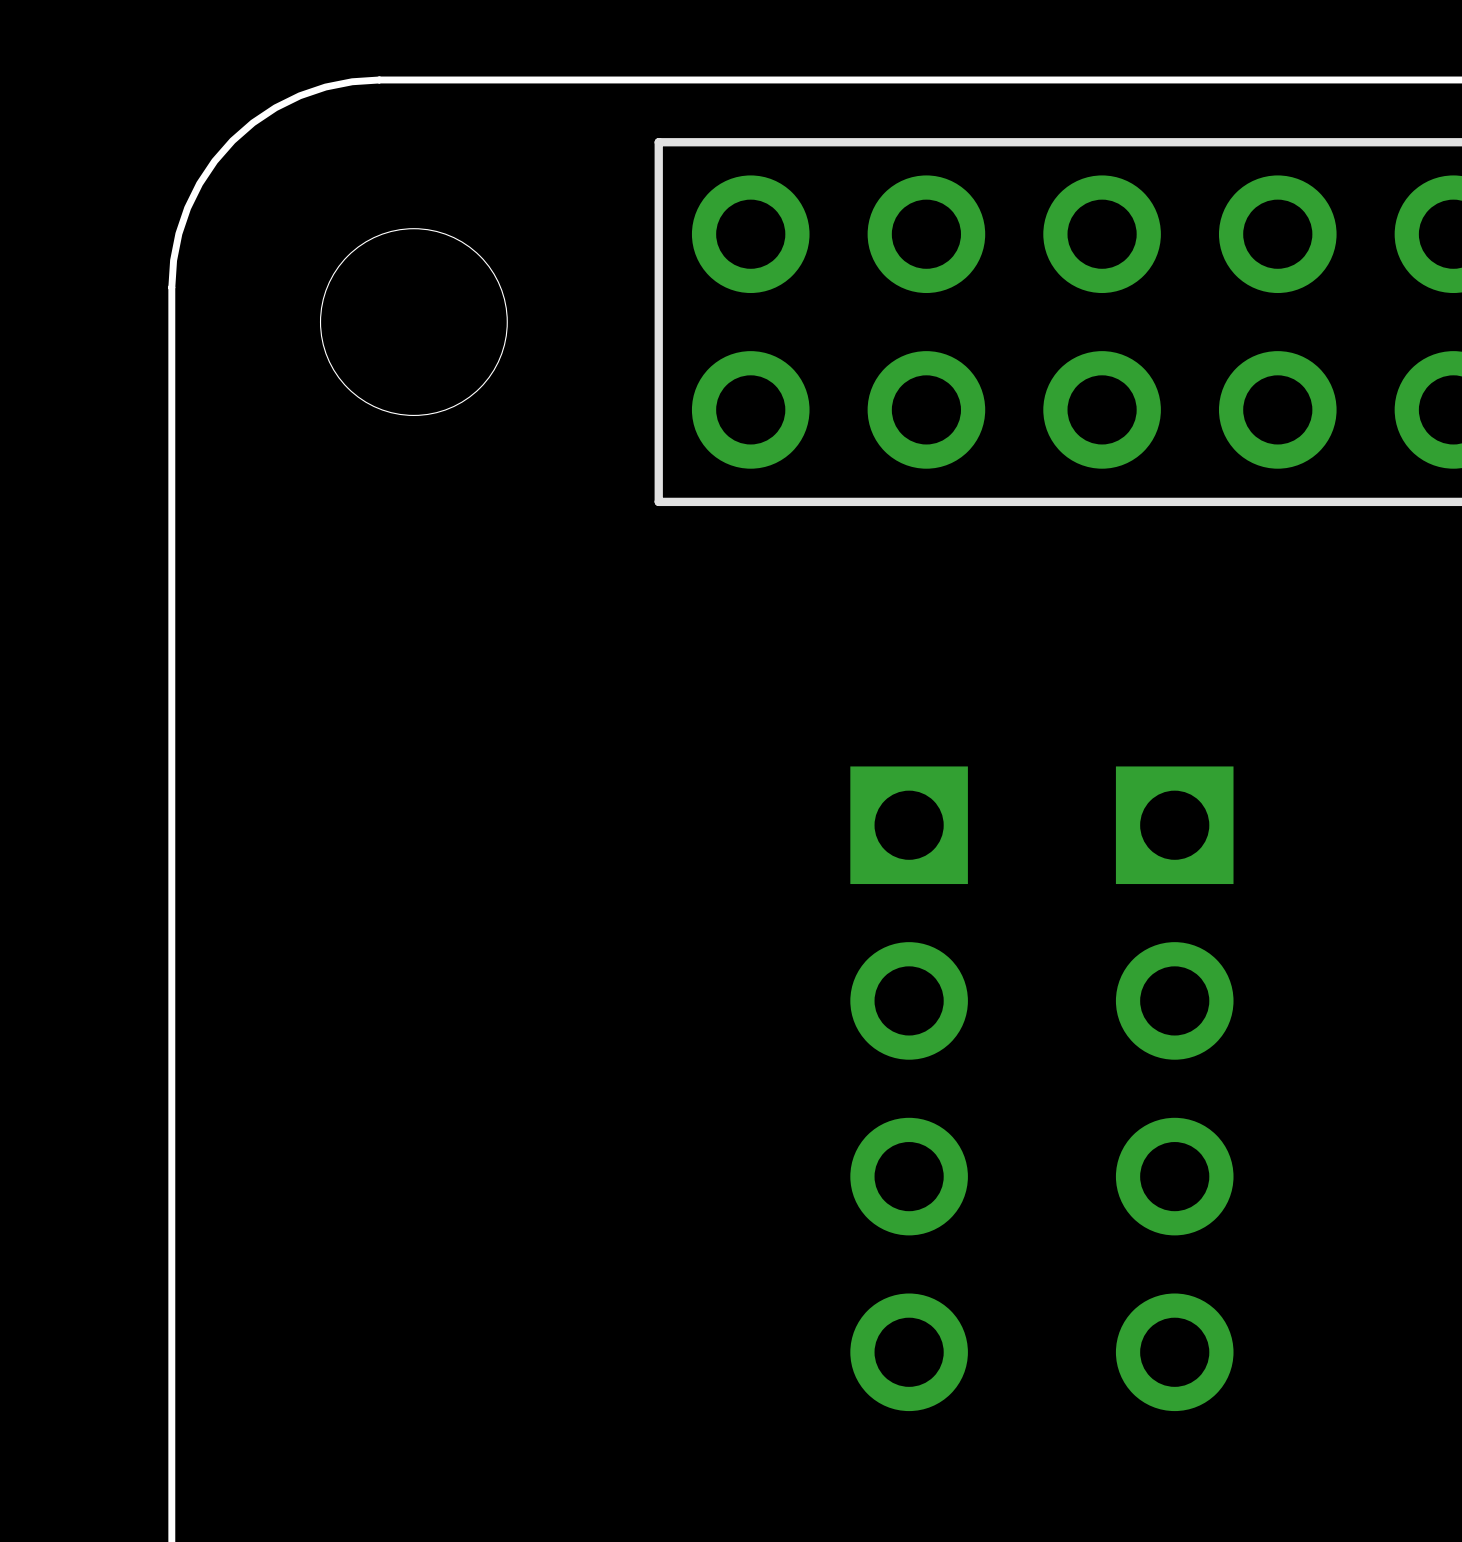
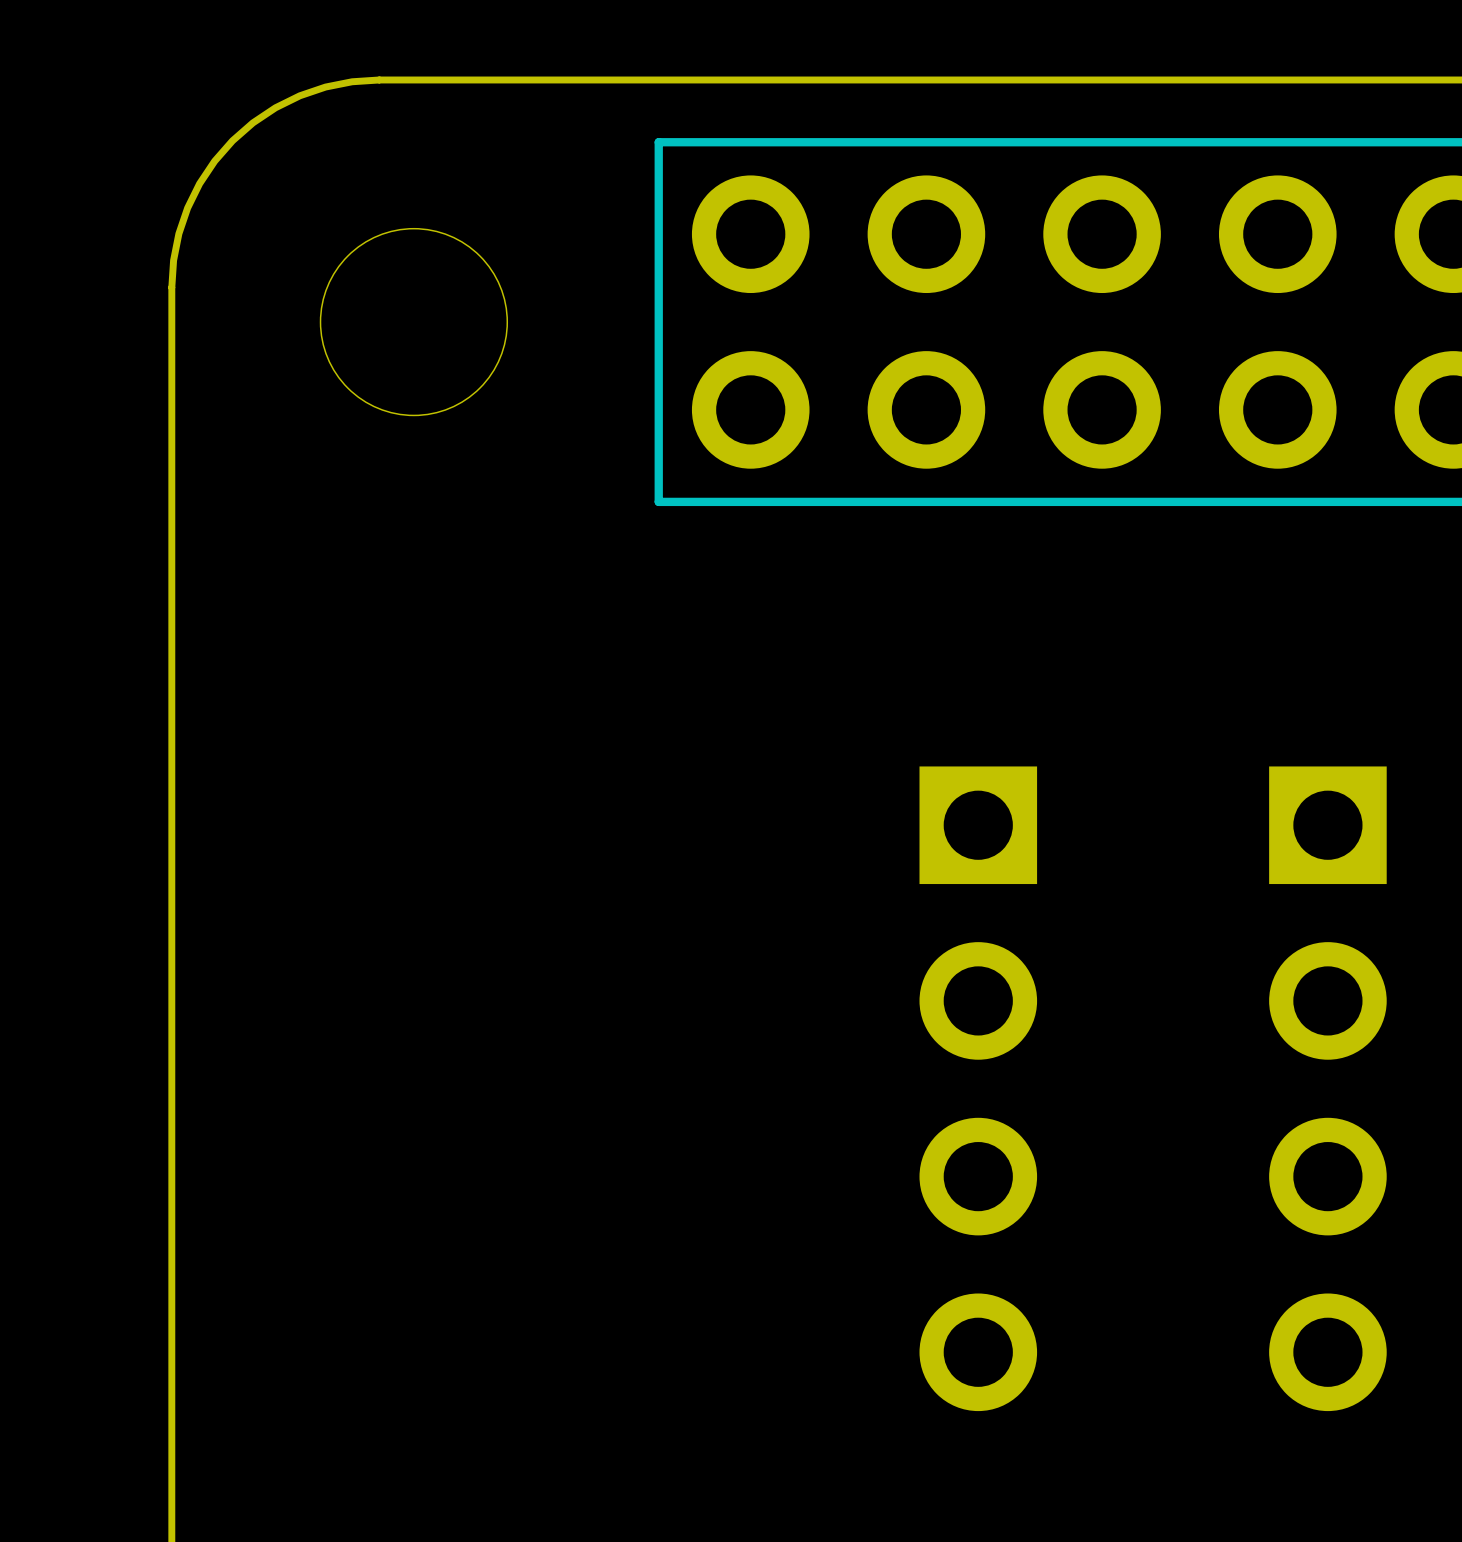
part position: (909, 1088) -> (978, 1088)
part position: (1174, 1088) -> (1327, 1088)

